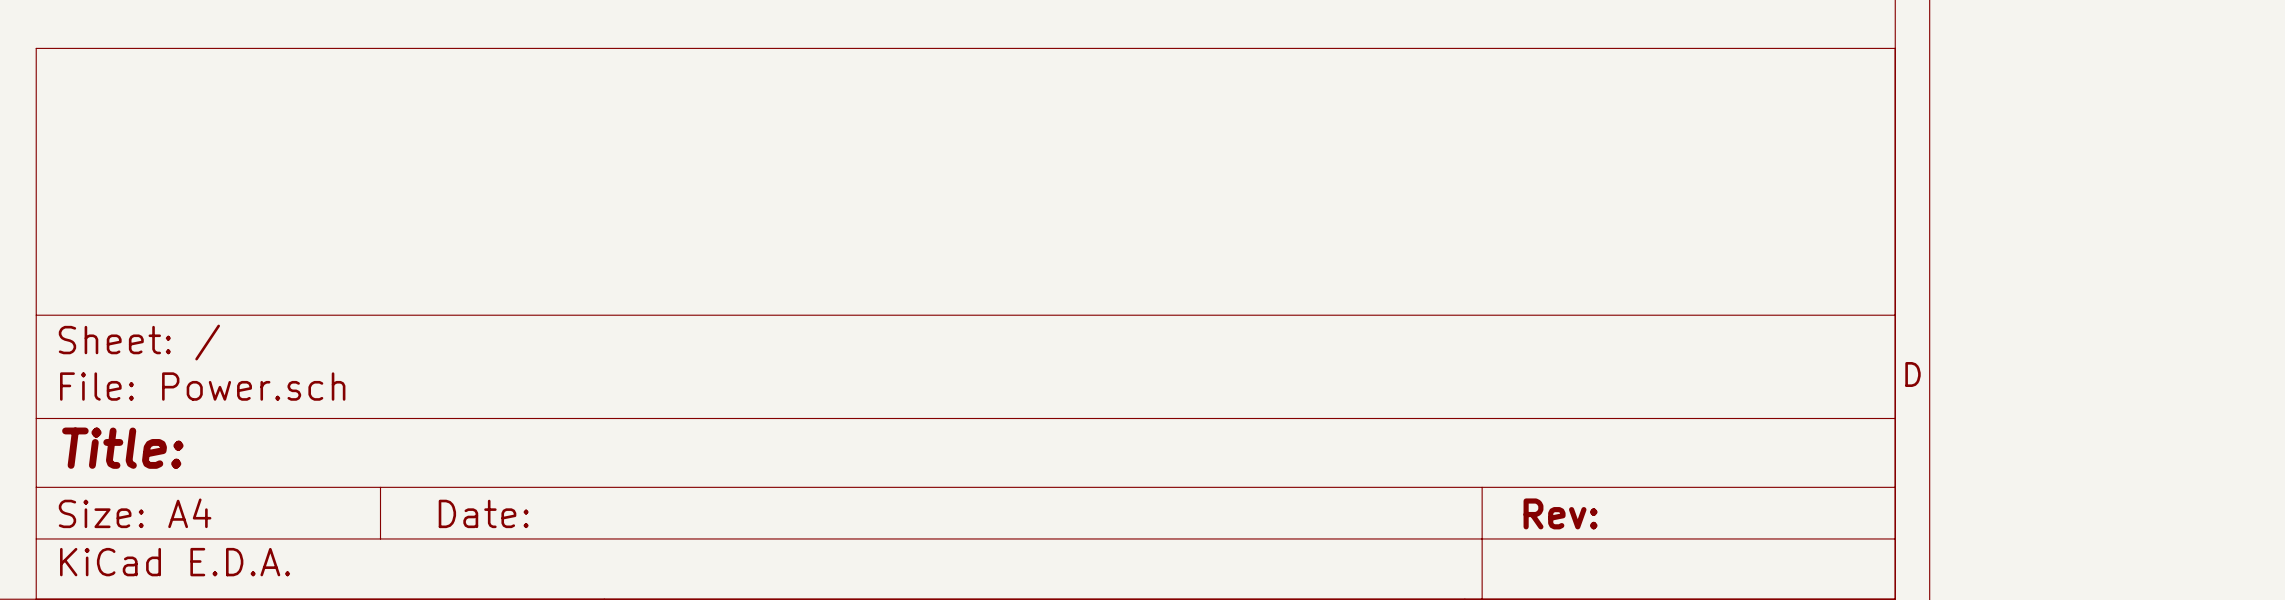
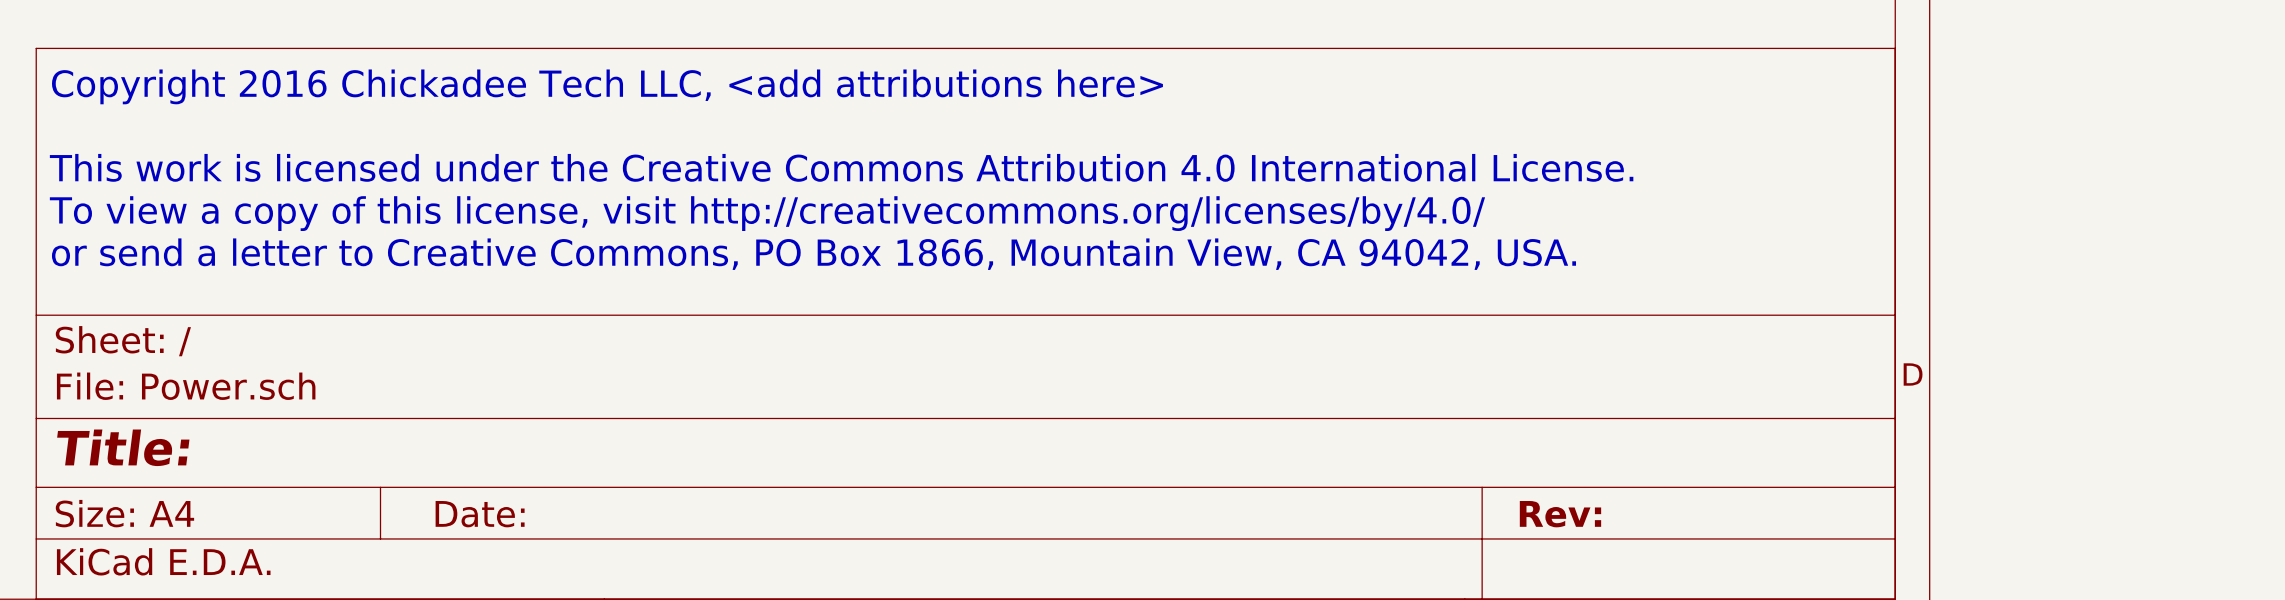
text: none -> Copyright 2016 Chickadee Tech LLC, <add attributions here> (607, 86)
text: none -> This work is licensed under the Creative Commons Attribution 4.0 International License. (841, 167)
text: none -> To view a copy of this license, visit http://creativecommons.org/licenses/by/4.0/ (767, 213)
text: none -> or send a letter to Creative Commons, PO Box 1866, Mountain View, CA 94042, USA. (813, 254)

